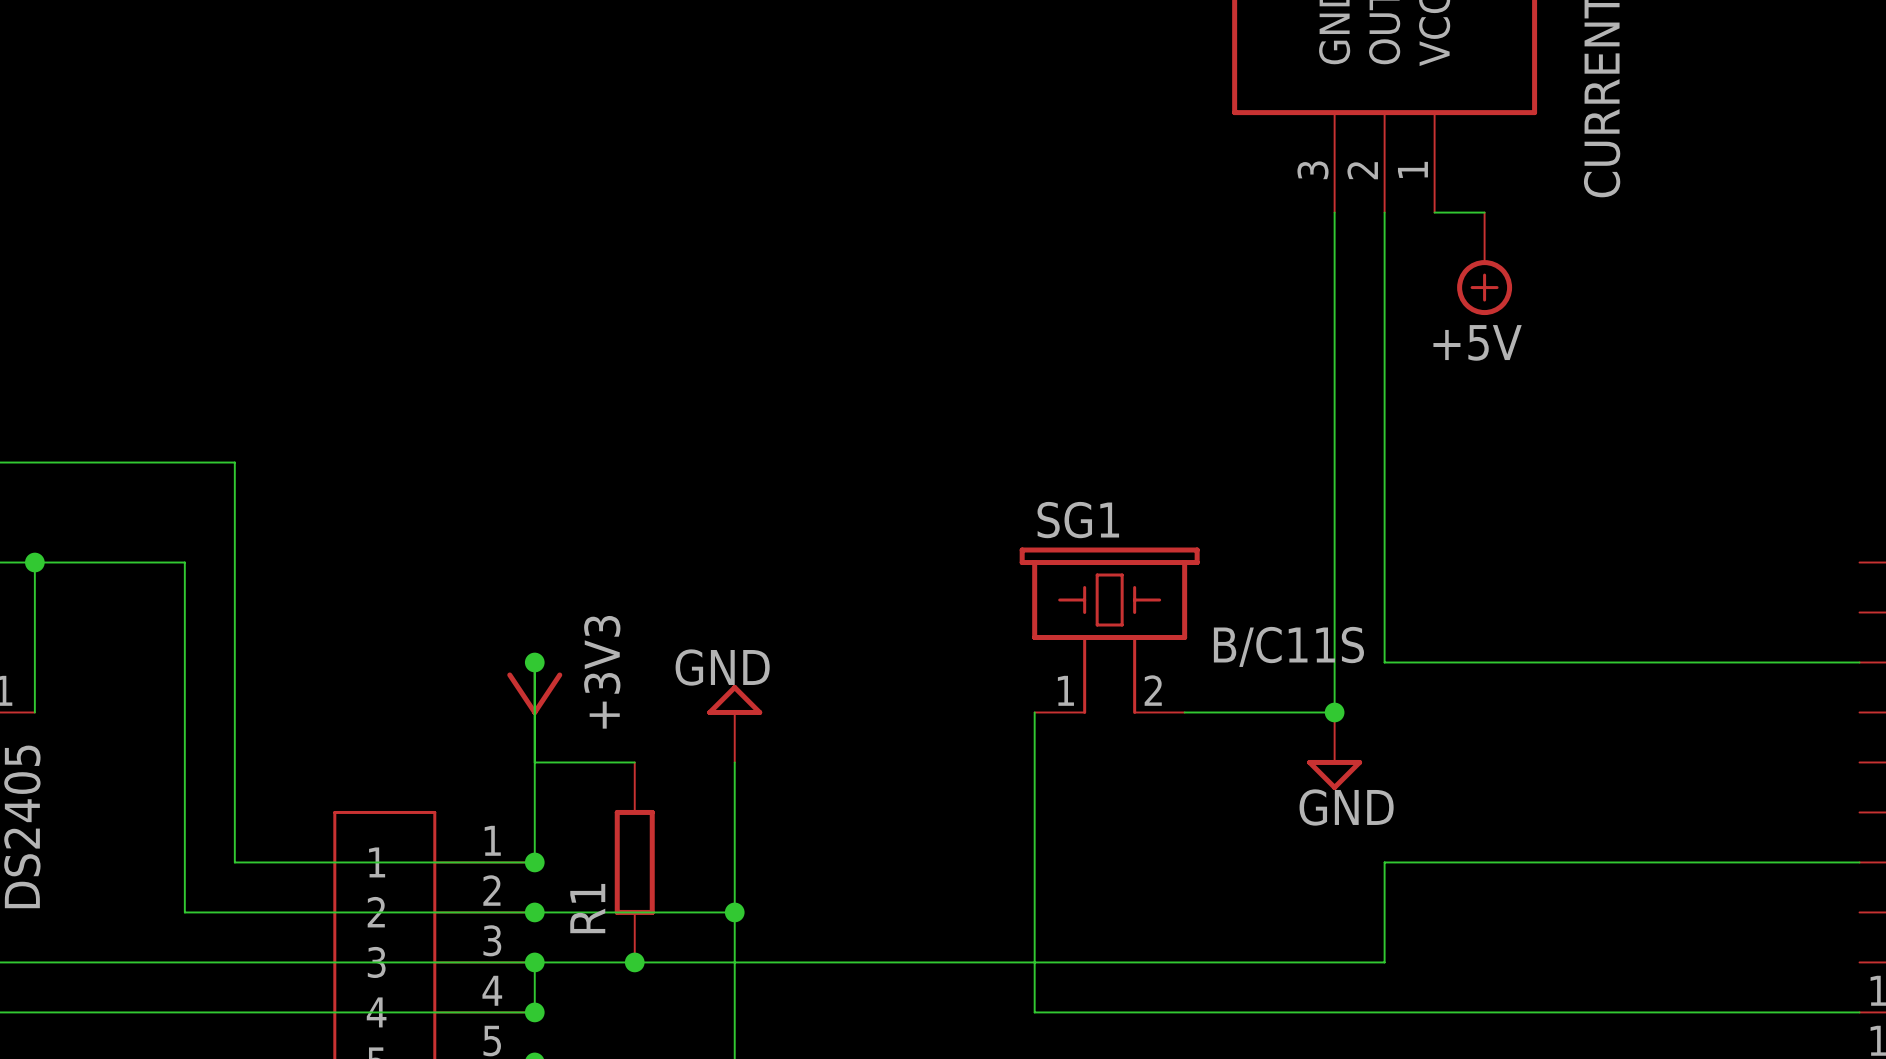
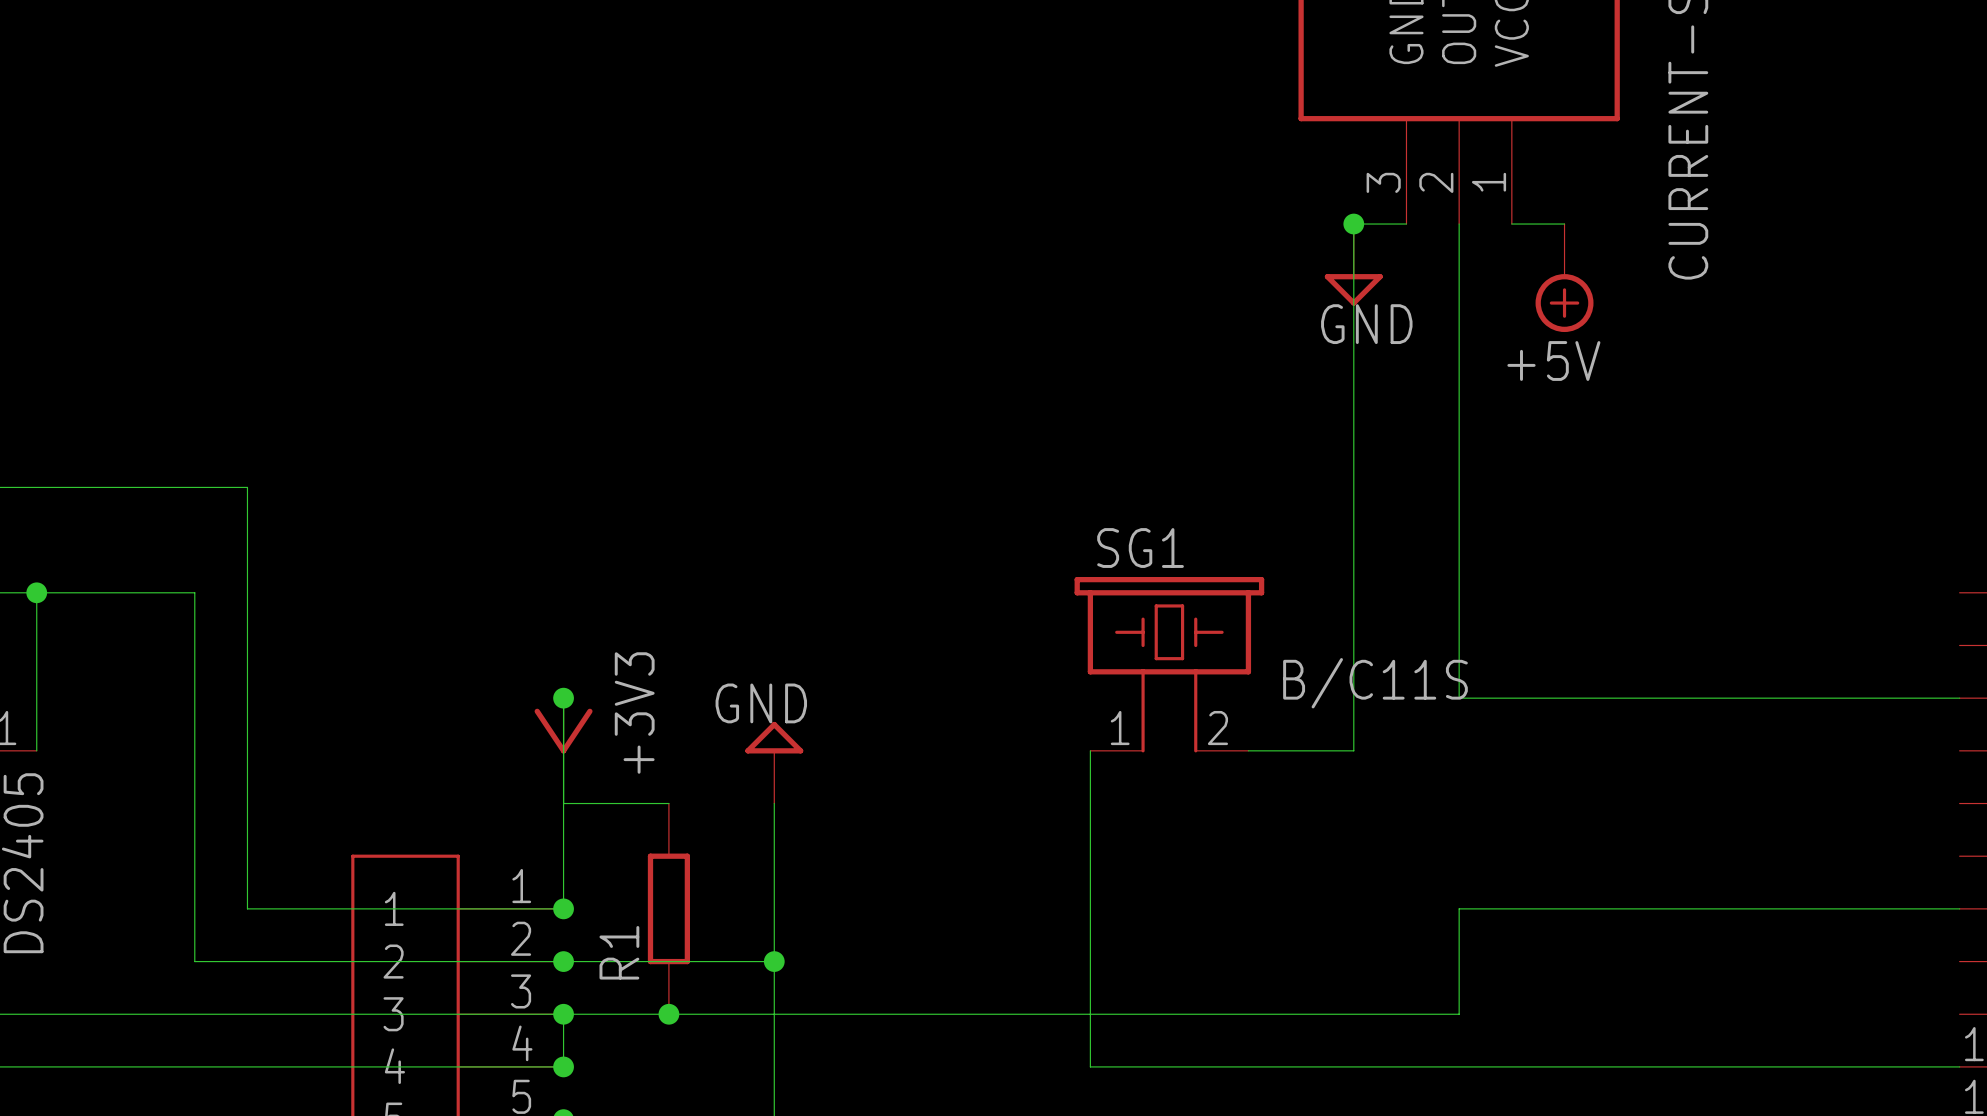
junction: none -> (1353, 224)
wire: (1334, 212) (1334, 712) (1284, 712) -> (1406, 224) (1353, 224) (1353, 750)
power symbol: none -> GND (1353, 264)
junction: (1334, 712) -> none
power symbol: GND (1334, 751) -> none

